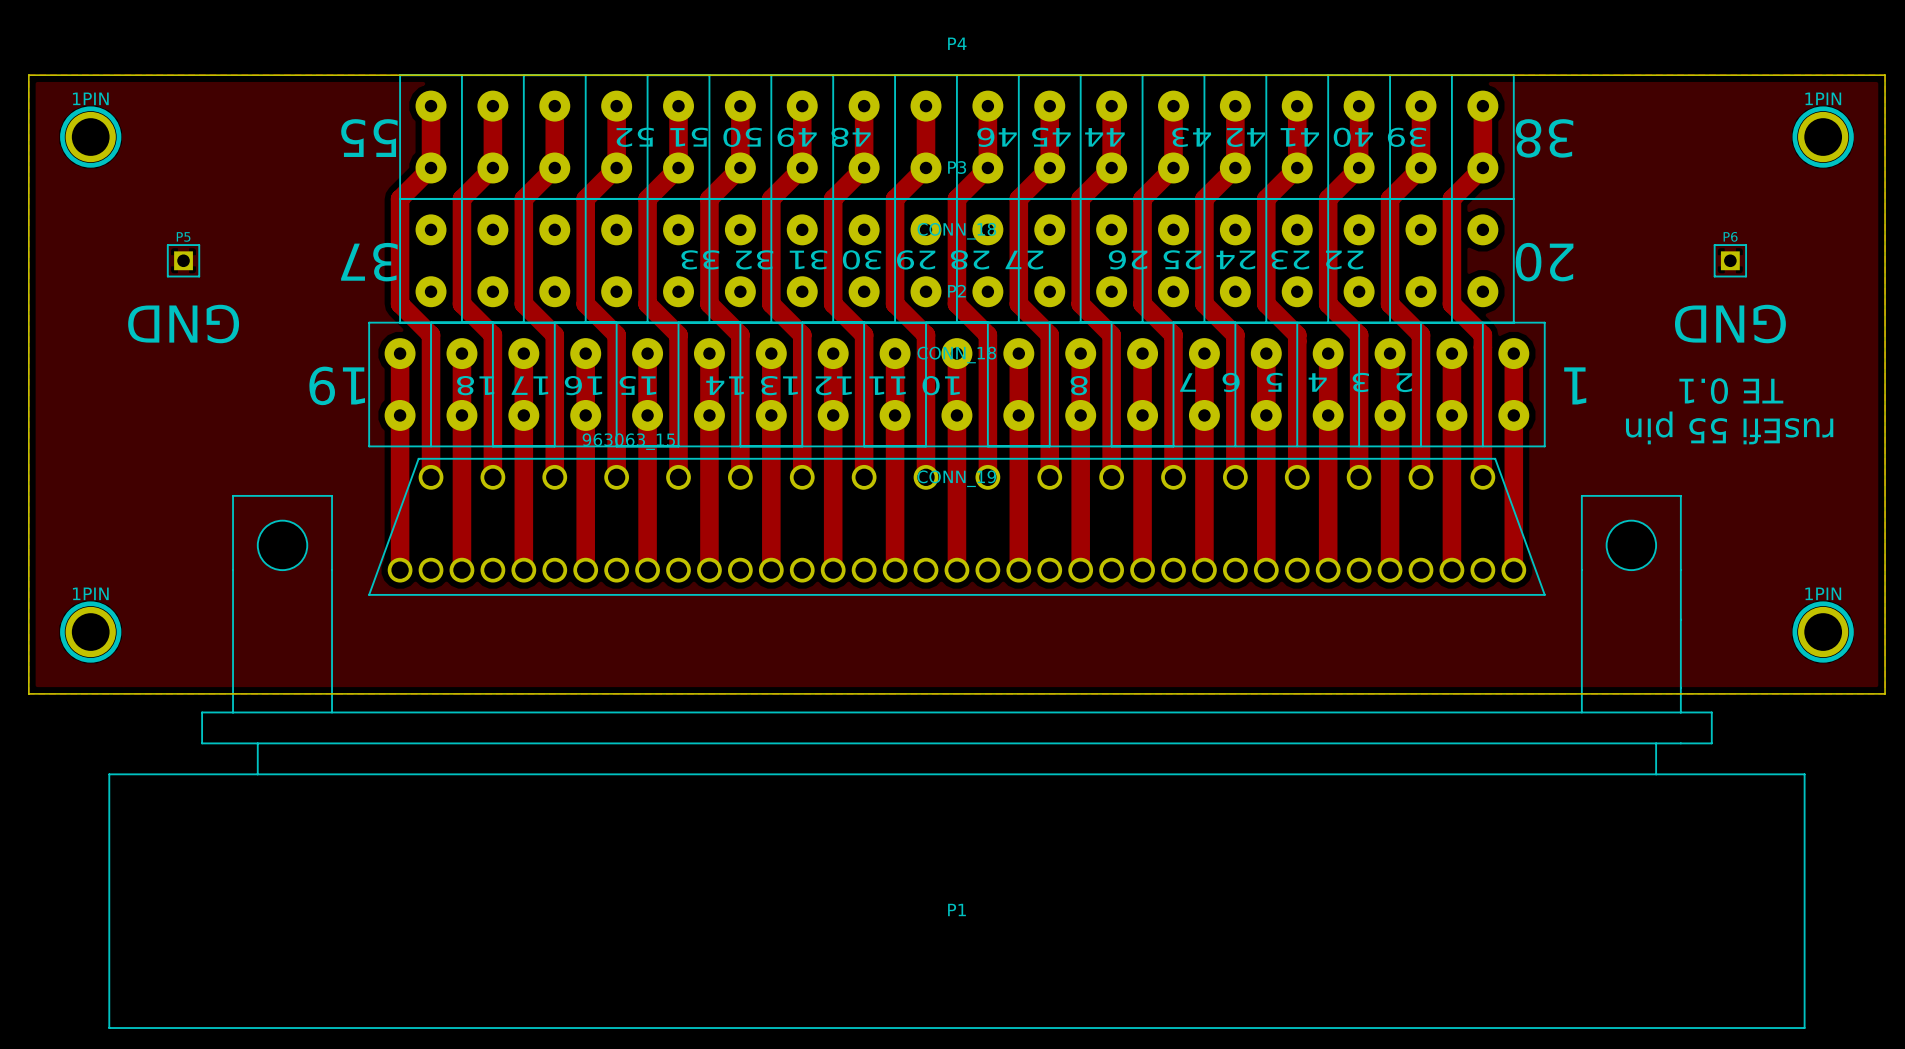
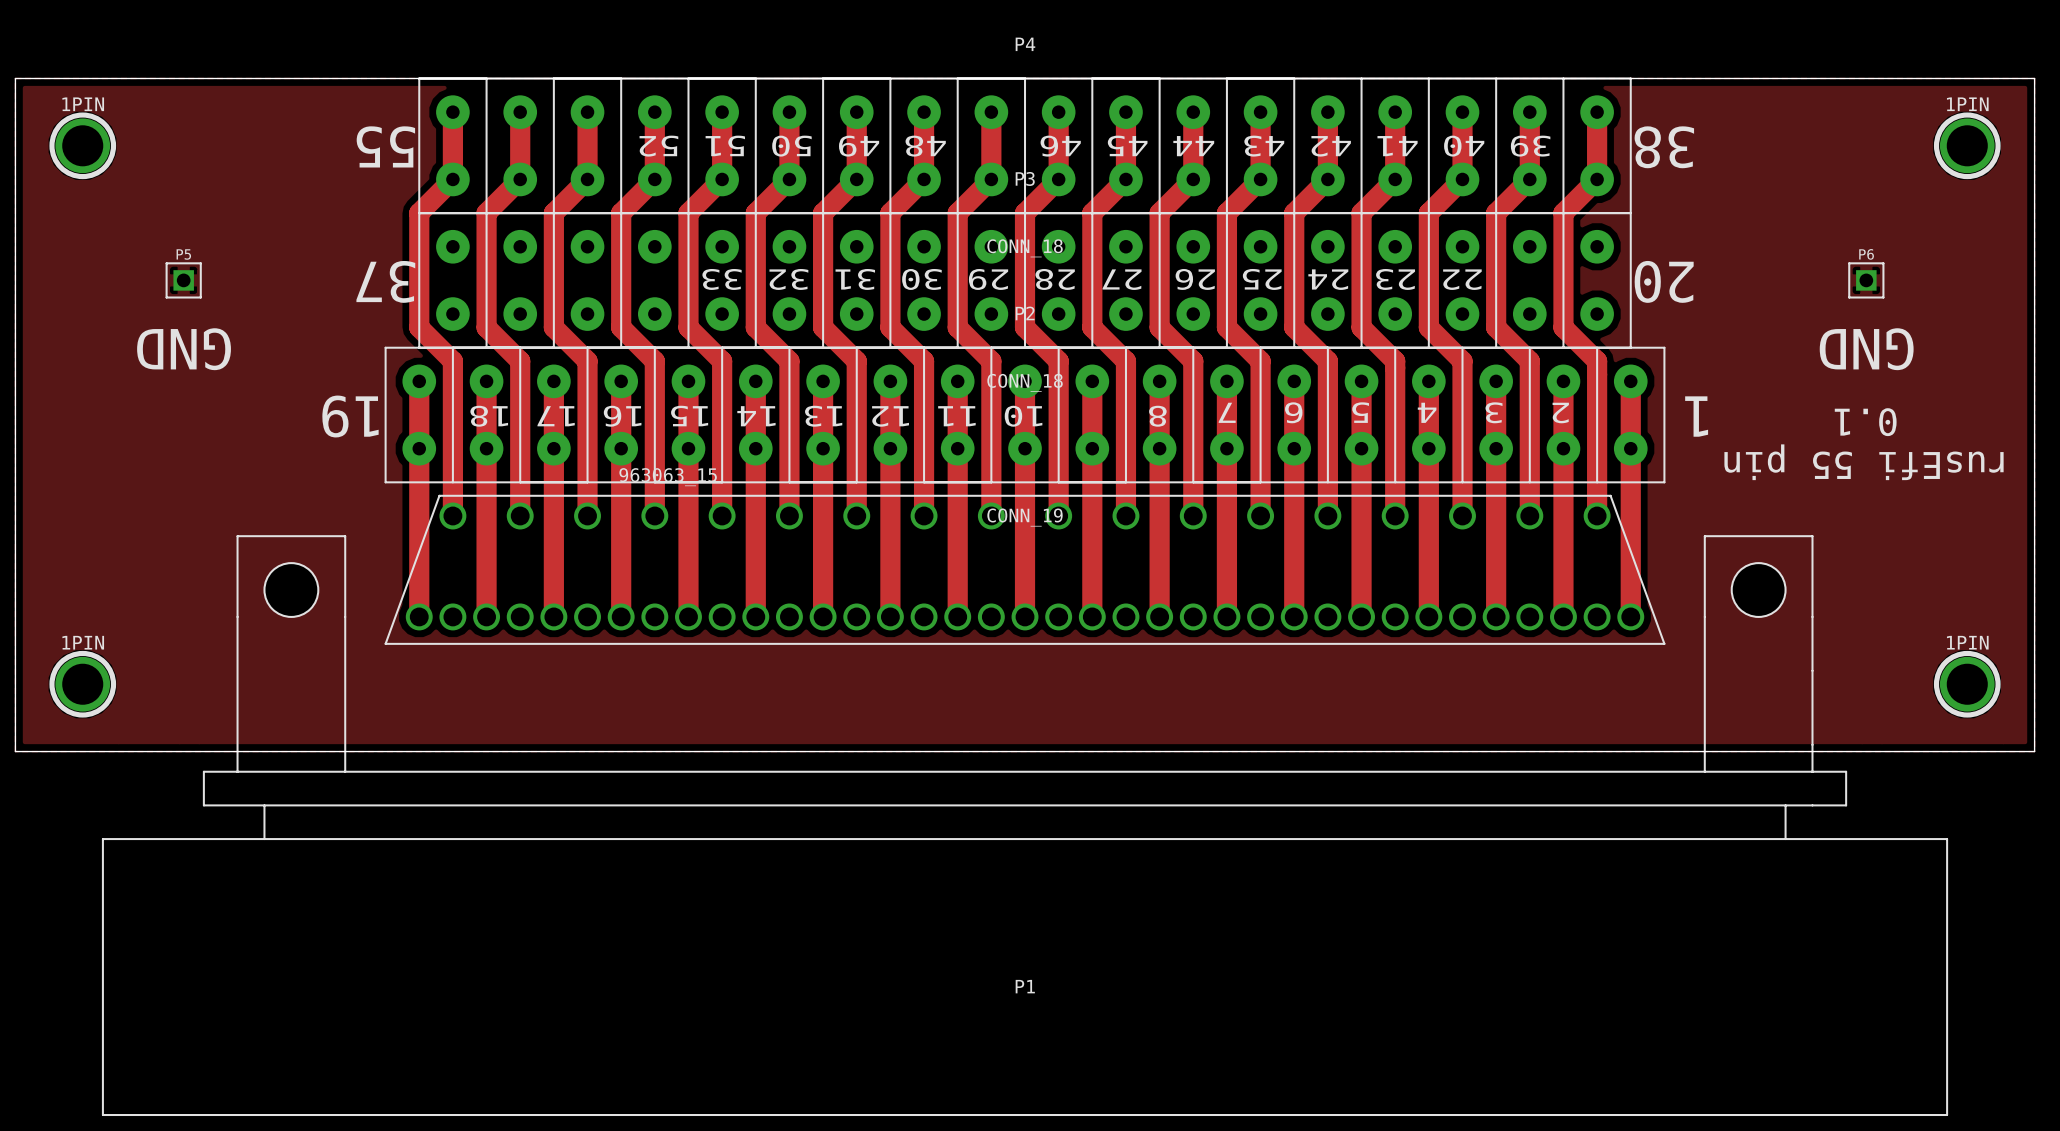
text: TE 0.1 (1731, 391) -> 0.1 (1865, 422)

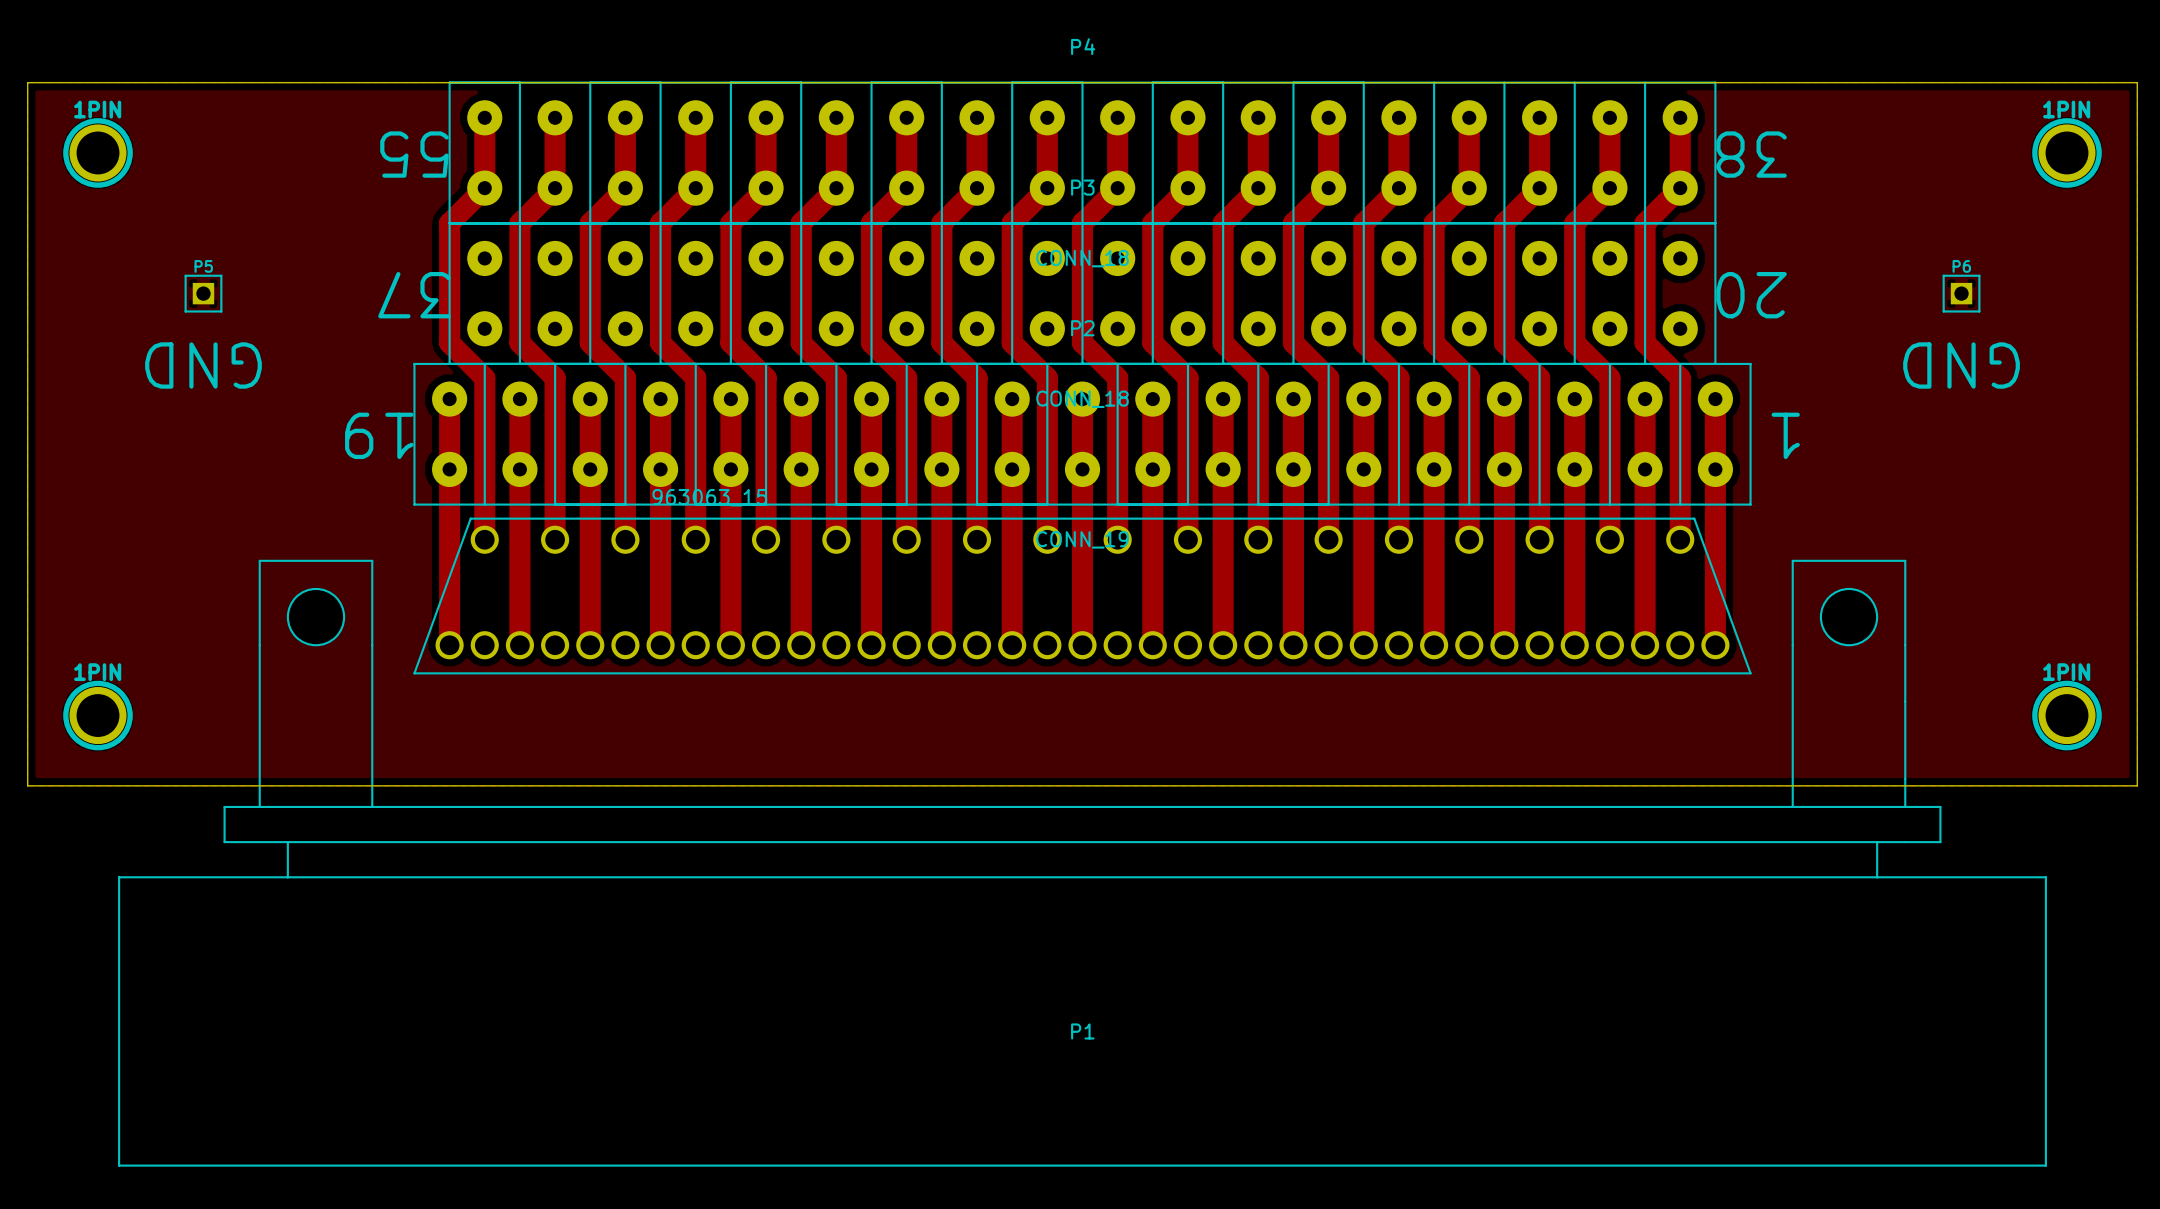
text: 48 49 50 51 52 (792, 146) -> none
text: 44 45 46 (1127, 146) -> none
text: 39 40 41 42 43 (1397, 146) -> none
text: 27 28 29 30 31 32 33 (921, 279) -> none
text: 22 23 24 25 26 (1328, 279) -> none
text: 2 3 4 5 6 7 (1393, 412) -> none
text: 15 16 17 18 (589, 416) -> none
text: 10 11 12 13 14 (889, 416) -> none
text: 8 (1157, 416) -> none
text: 0.1 (1865, 422) -> none
text: rusEfi 55 pin (1864, 462) -> none

